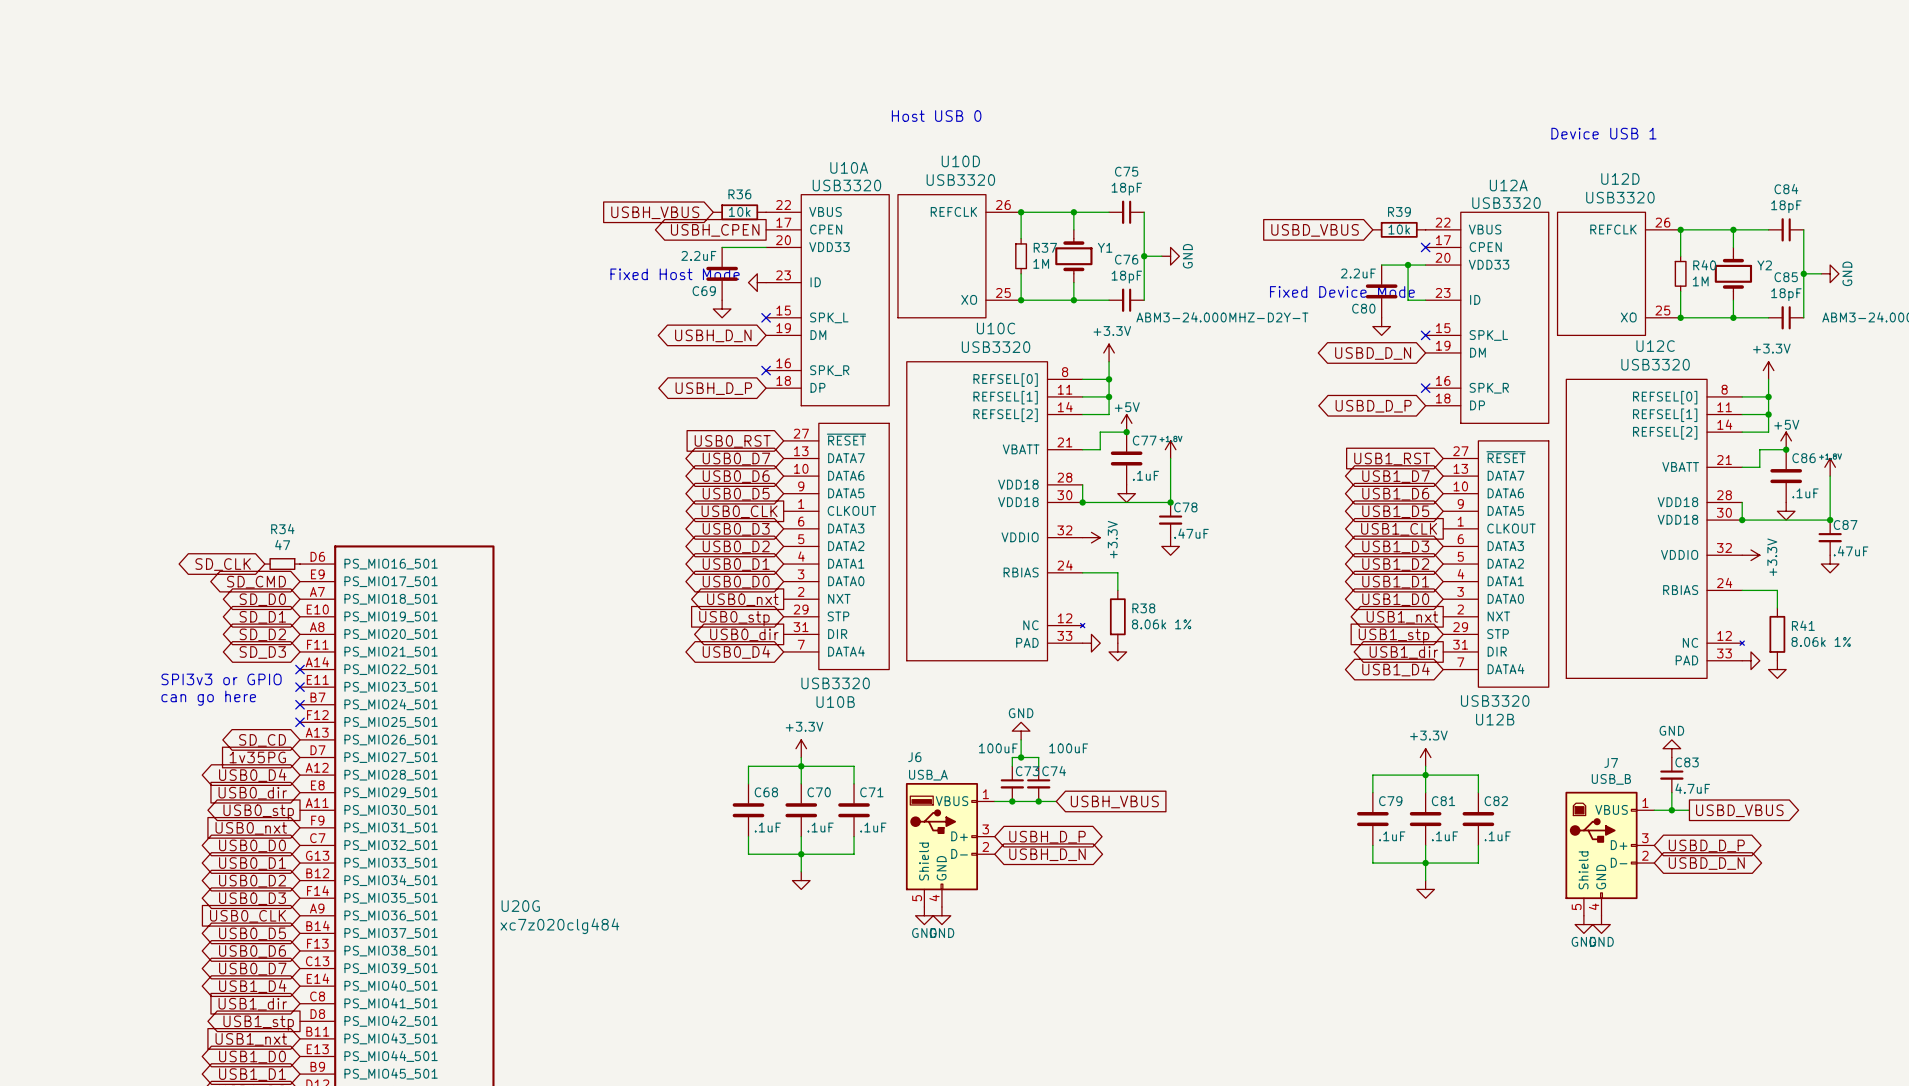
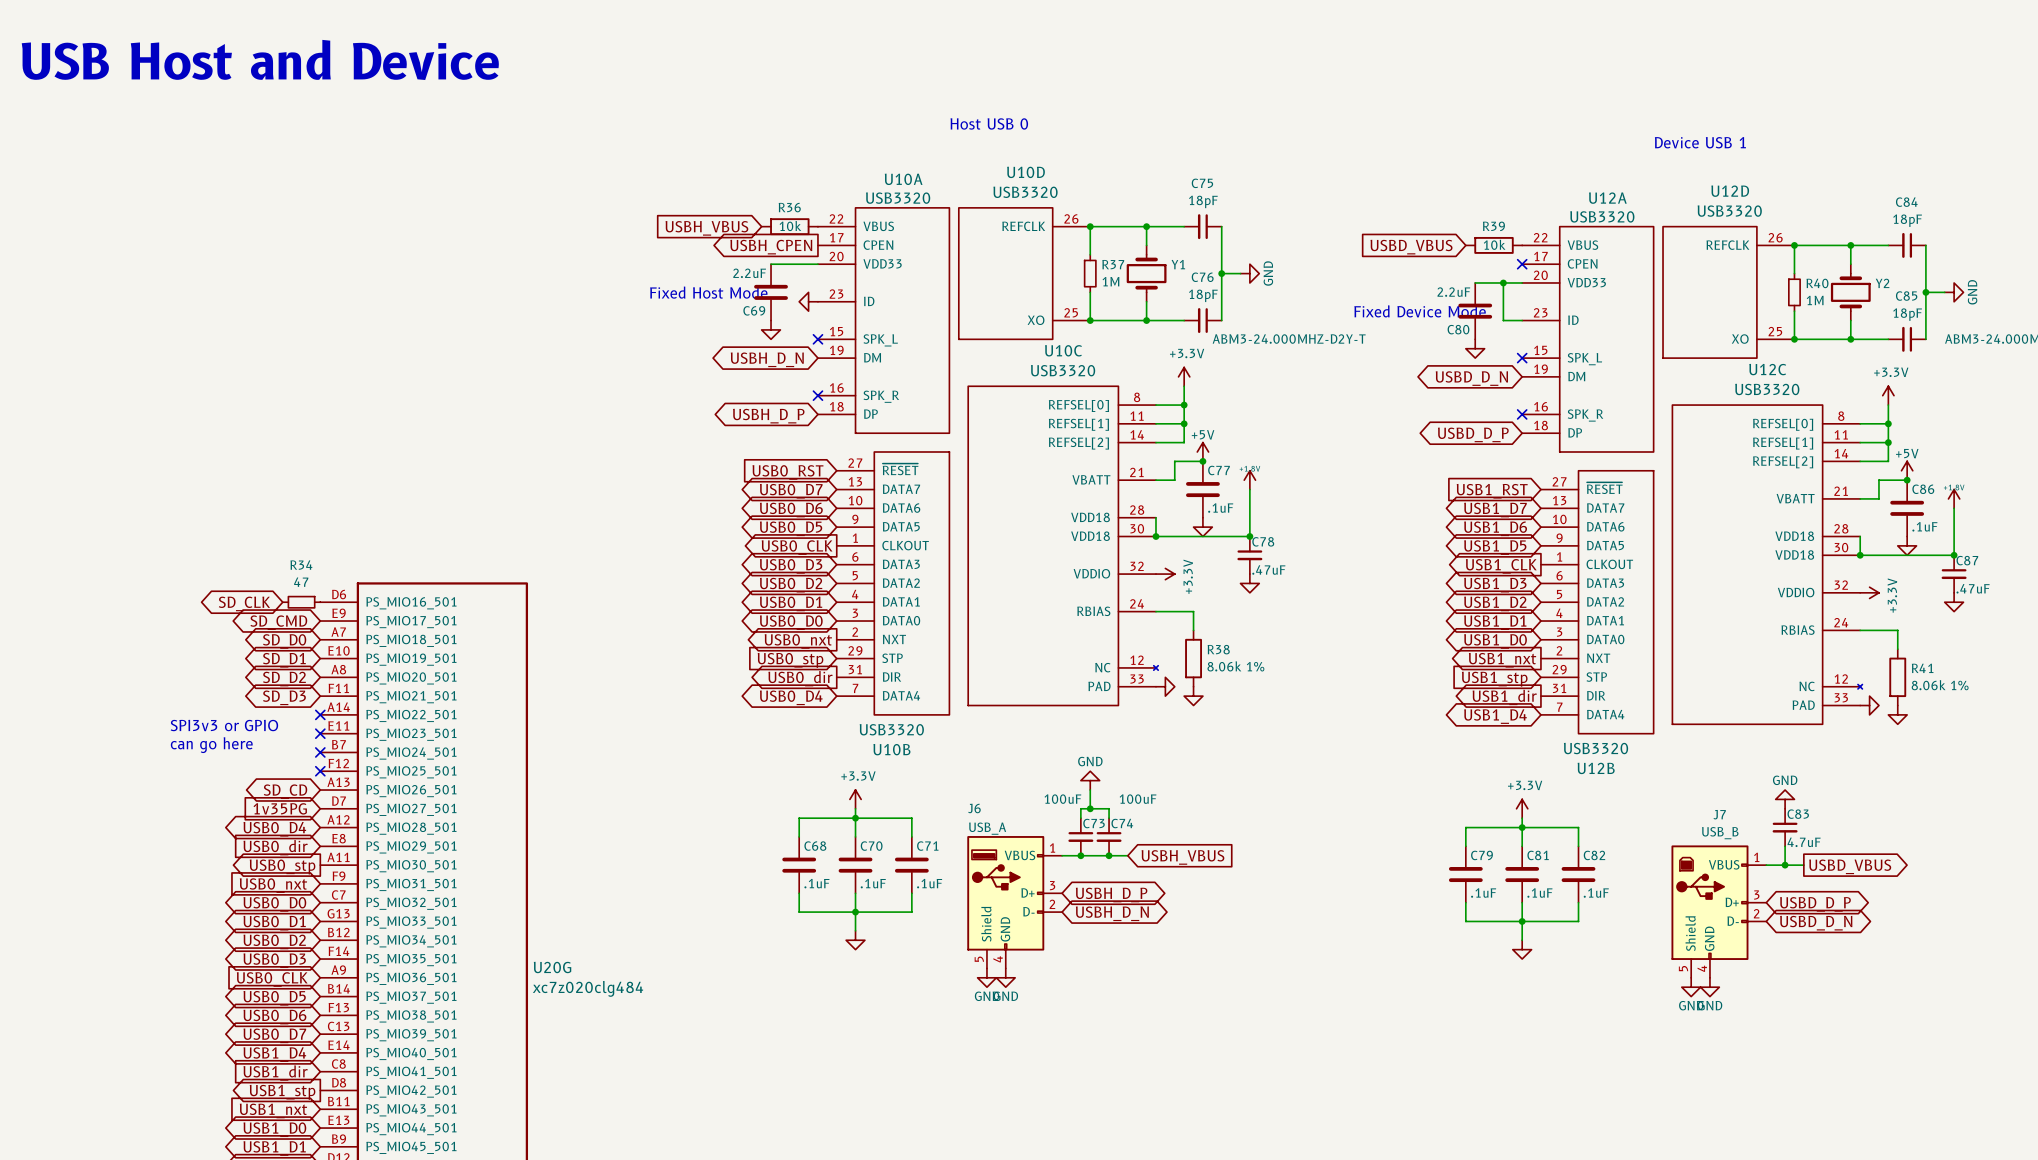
text: none -> USB Host and Device (260, 59)

